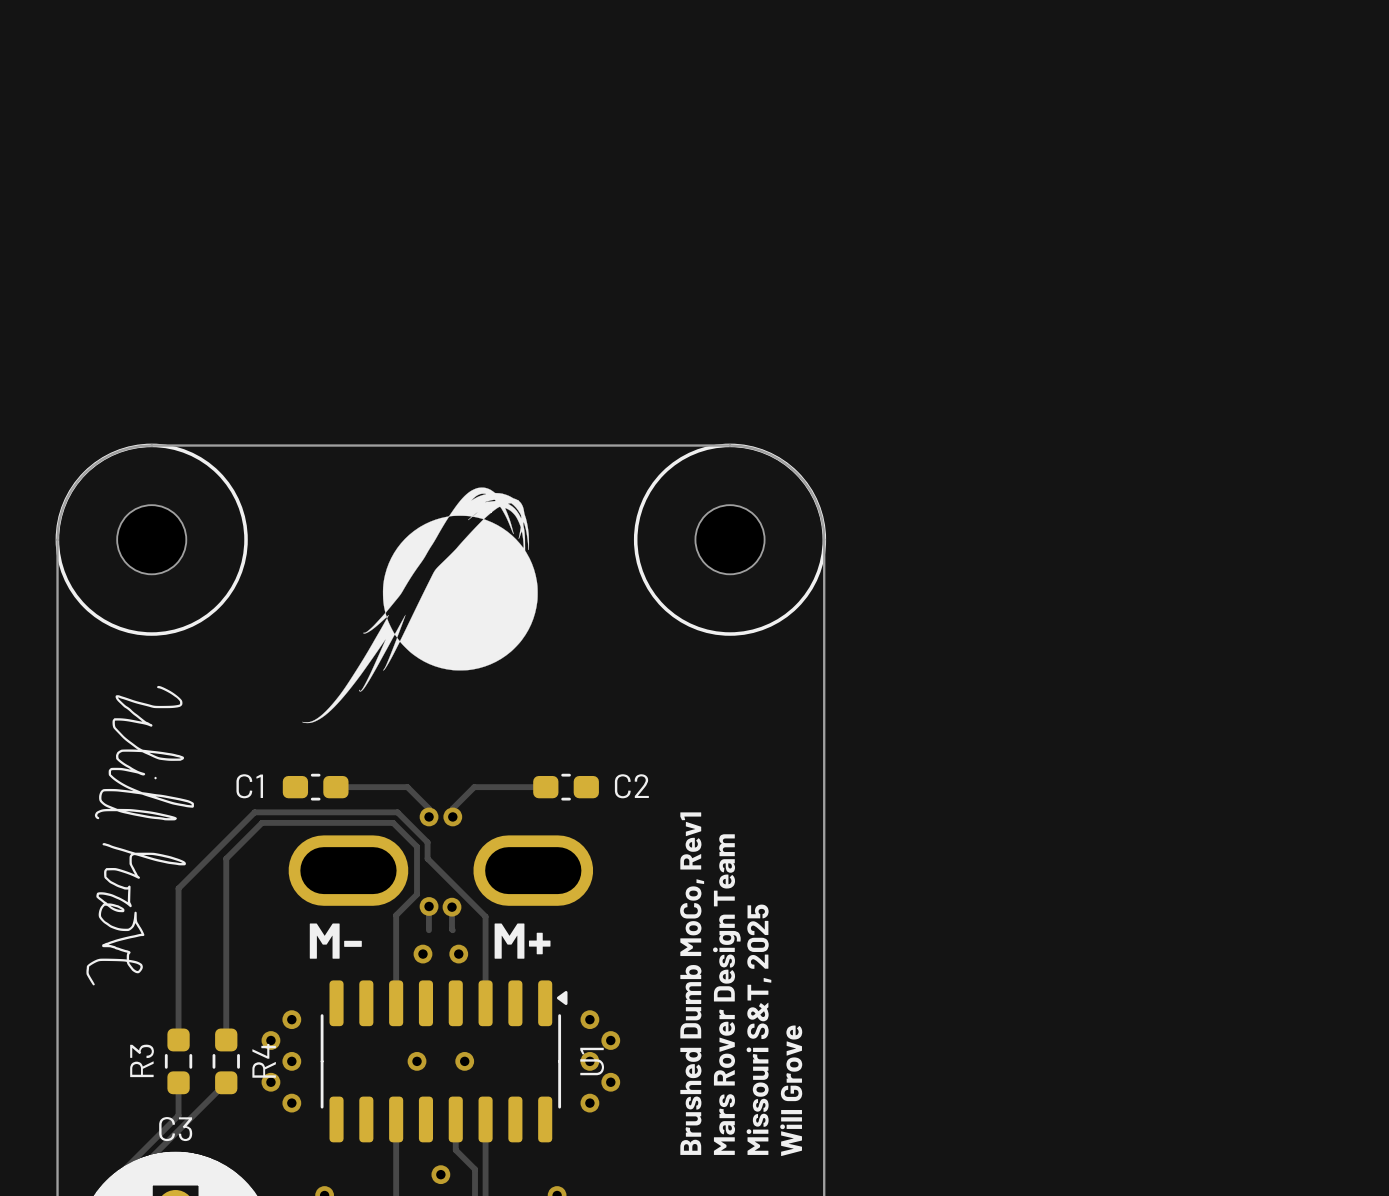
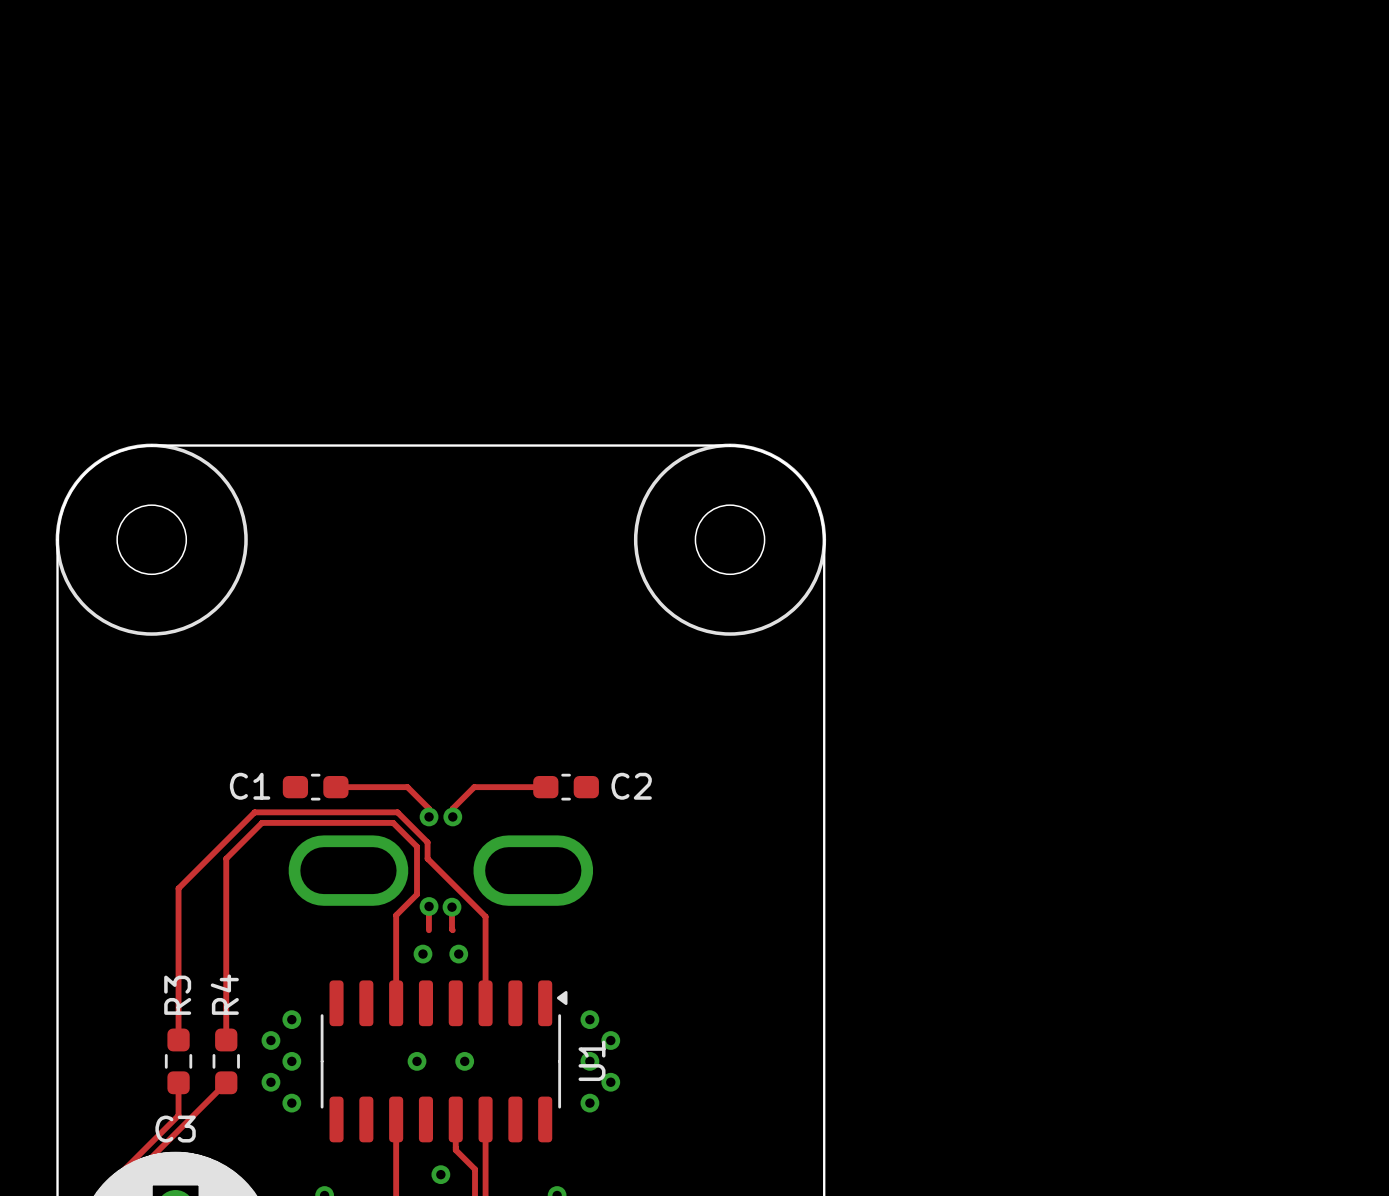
drawing: [302, 487, 538, 724] -> none
drawing: [86, 685, 194, 986] -> none
text: M- (335, 941) -> none
text: M+ (522, 941) -> none
text: Brushed Dumb MoCo, Rev1 (692, 983) -> none
text: Mars Rover Design Team (726, 994) -> none
text: Missouri S&T, 2025 (758, 1029) -> none
R3 name position: R3 (142, 1060) -> R3 (177, 995)
R4 name position: R4 (264, 1060) -> R4 (224, 994)
text: Will Grove (791, 1090) -> none

